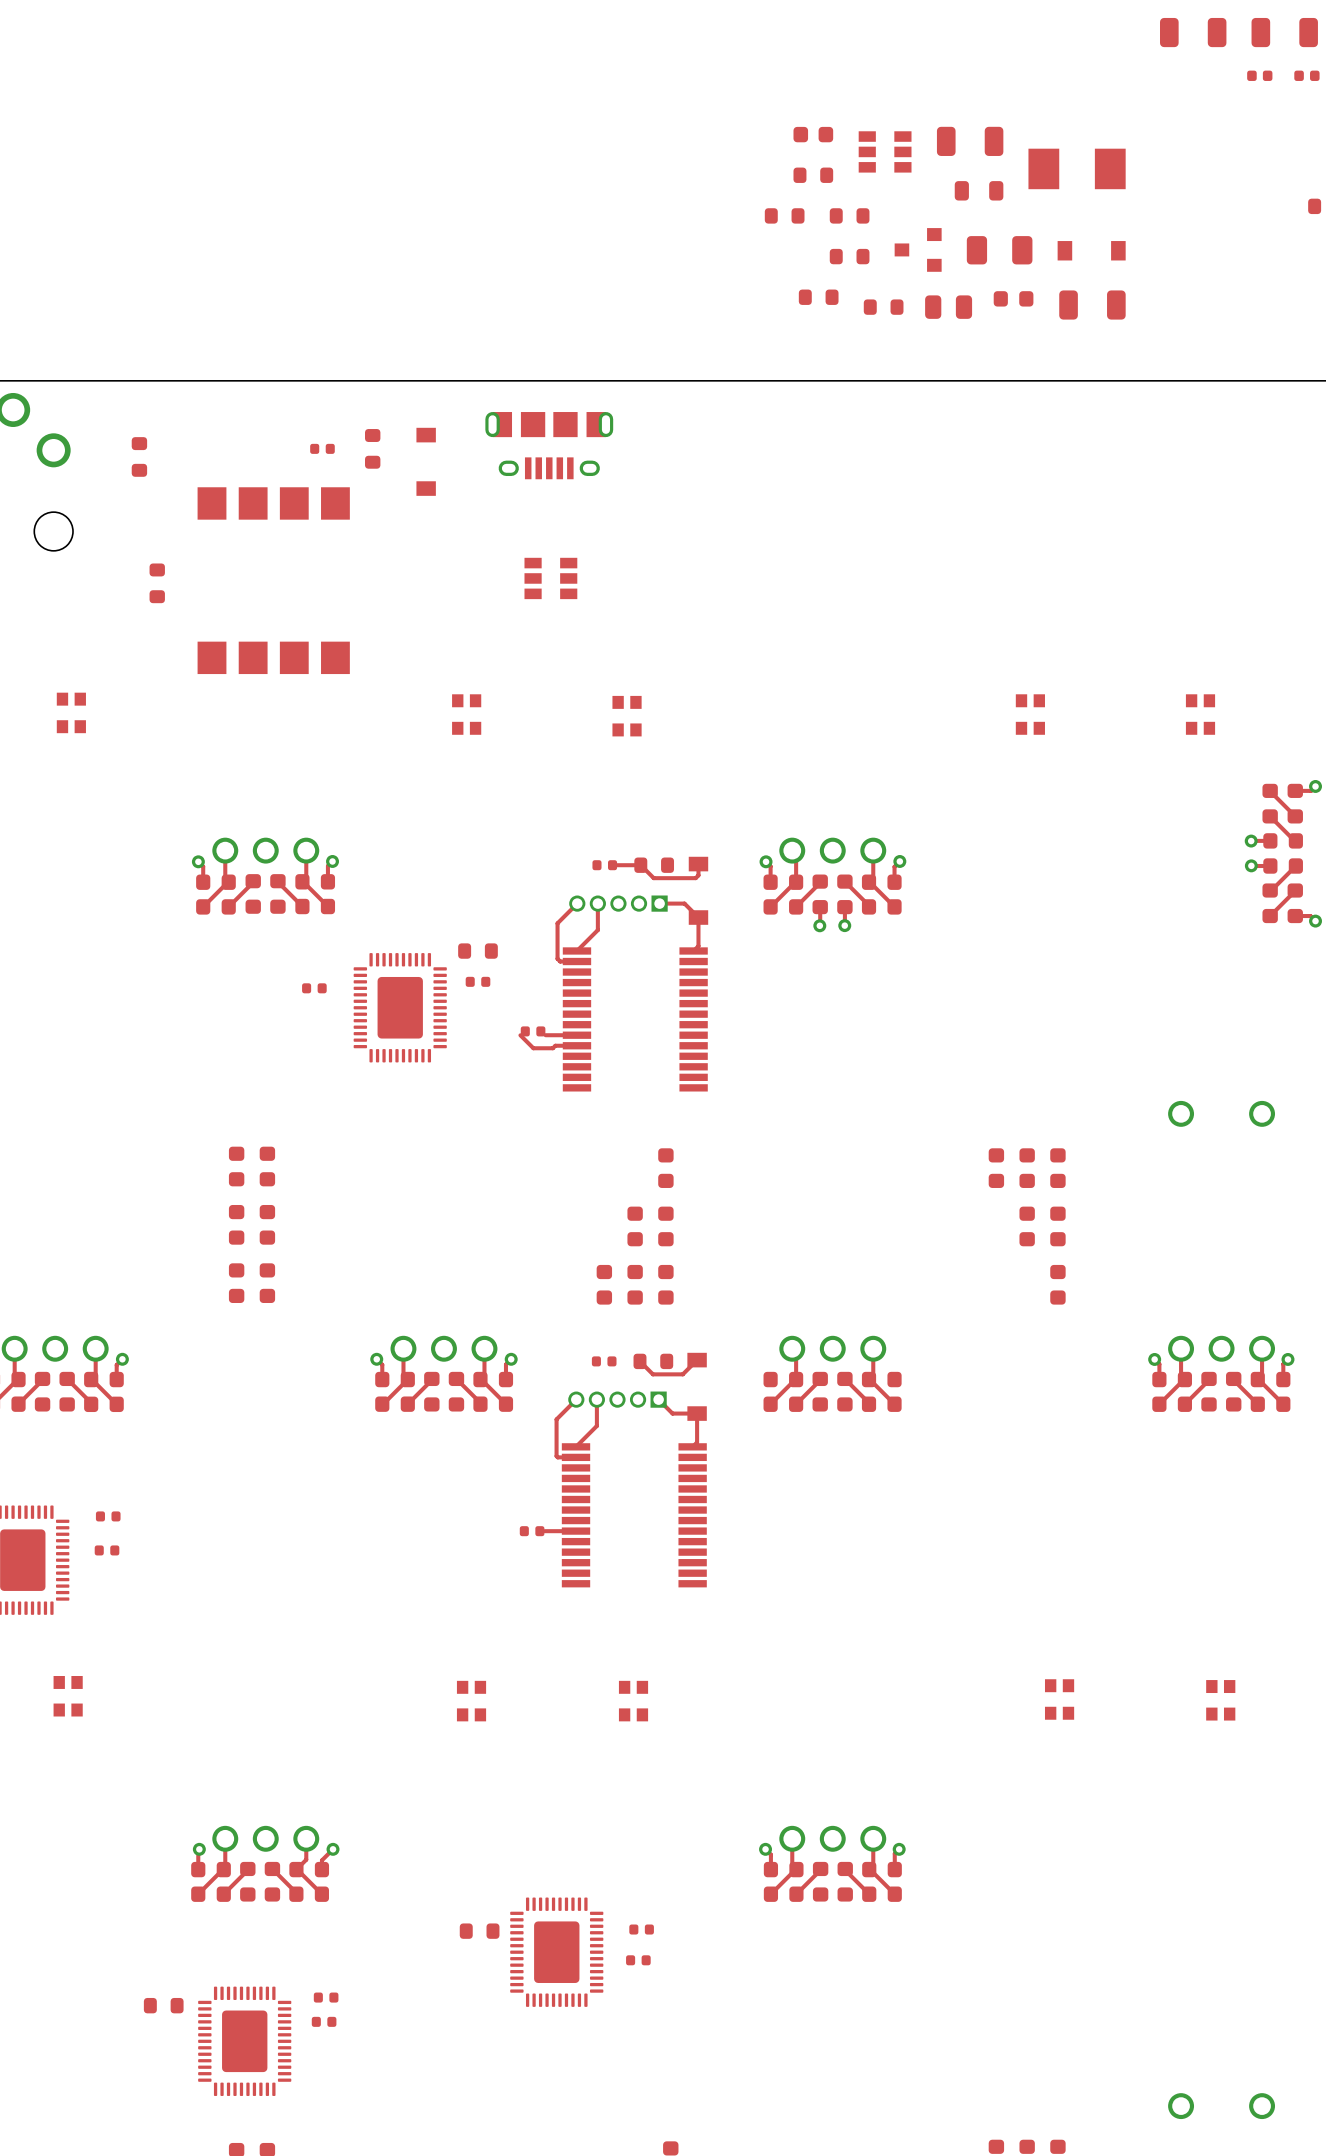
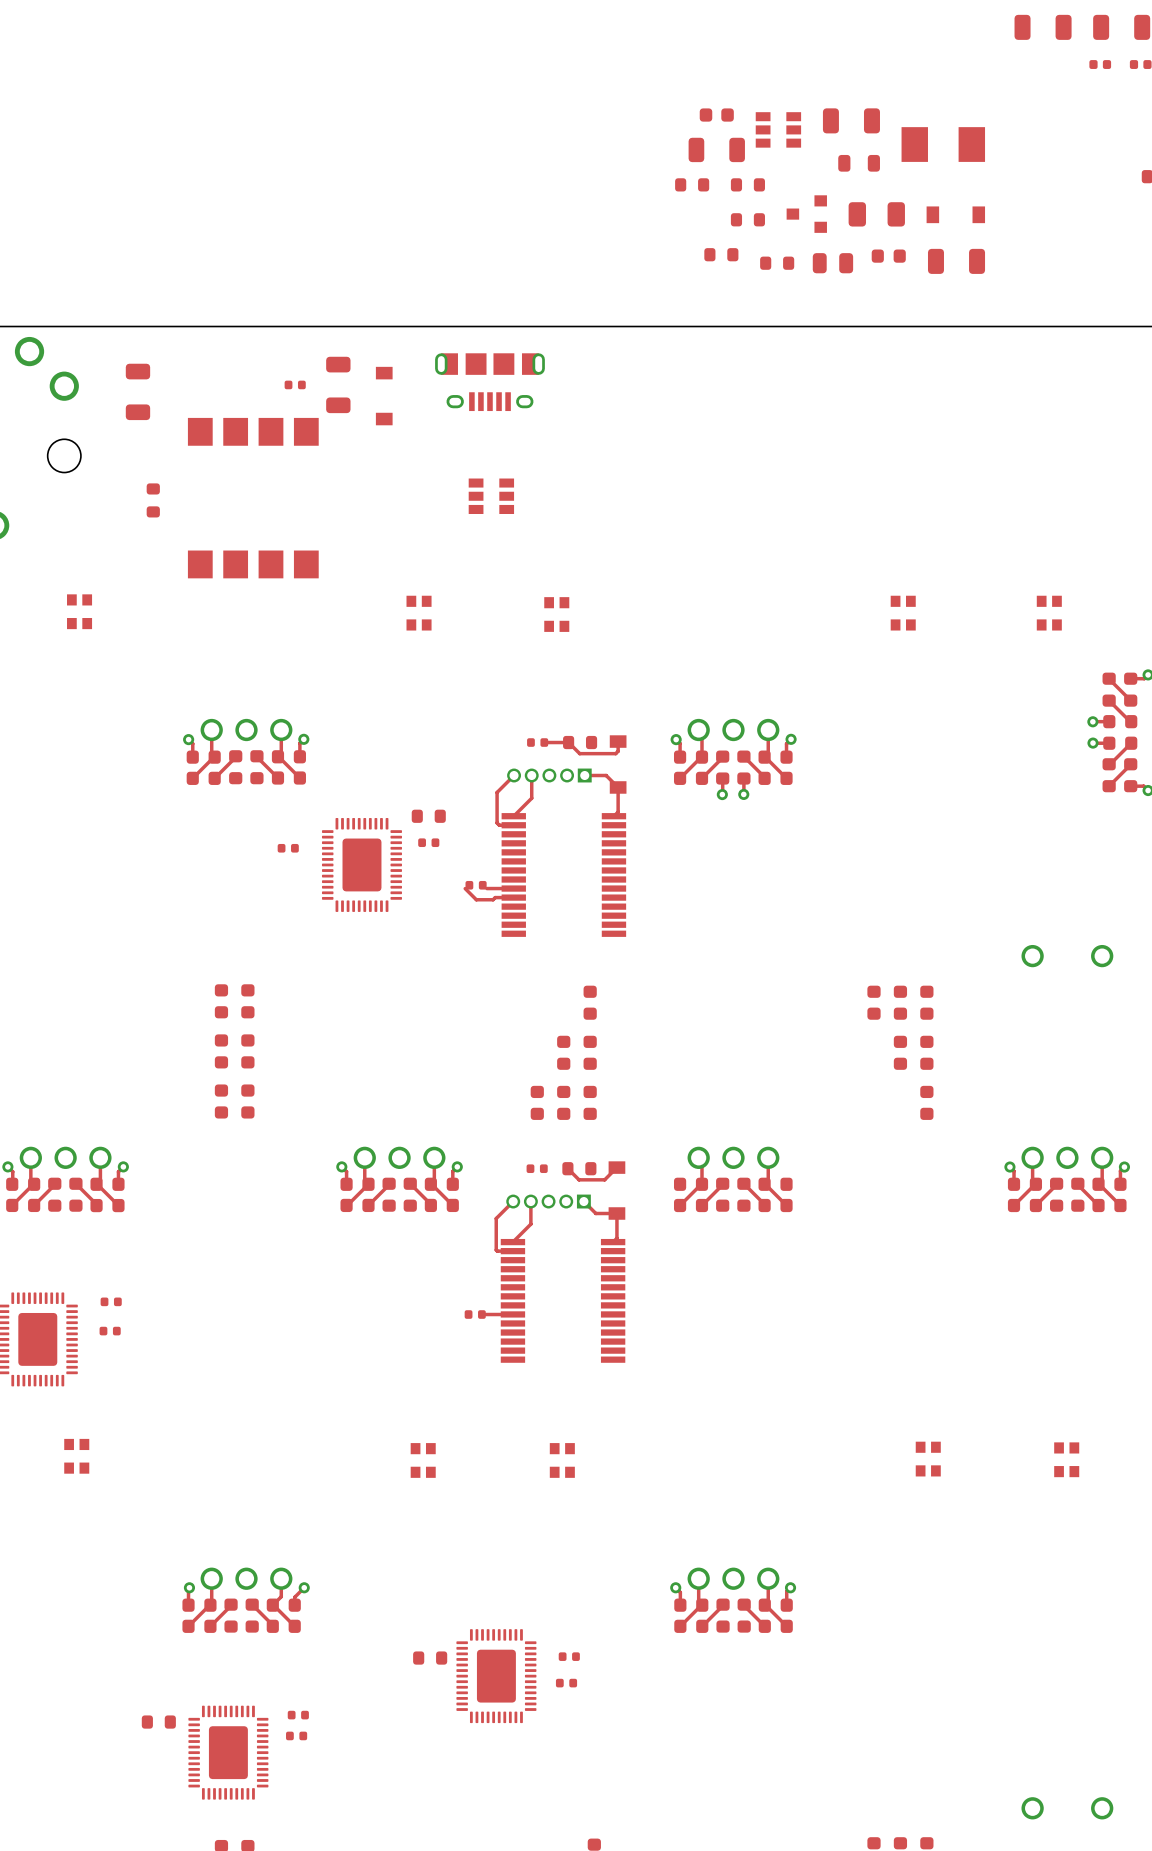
part footprint: [793, 167, 834, 183] -> [688, 137, 745, 163]
part footprint: [365, 429, 381, 469] -> [326, 356, 351, 414]
part footprint: [131, 437, 148, 477] -> [125, 363, 151, 421]

